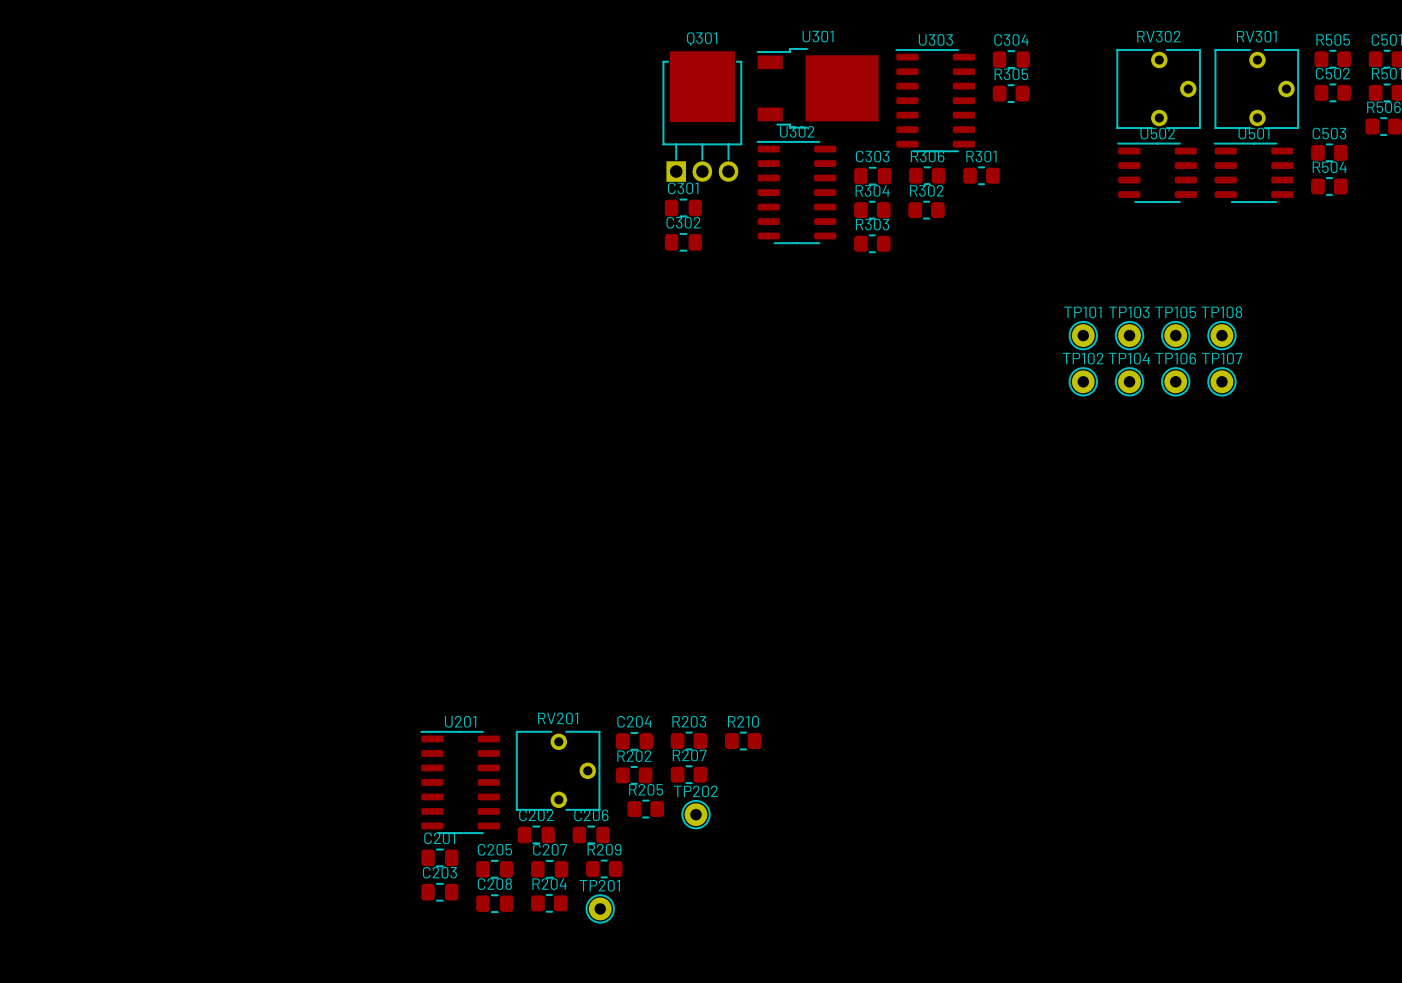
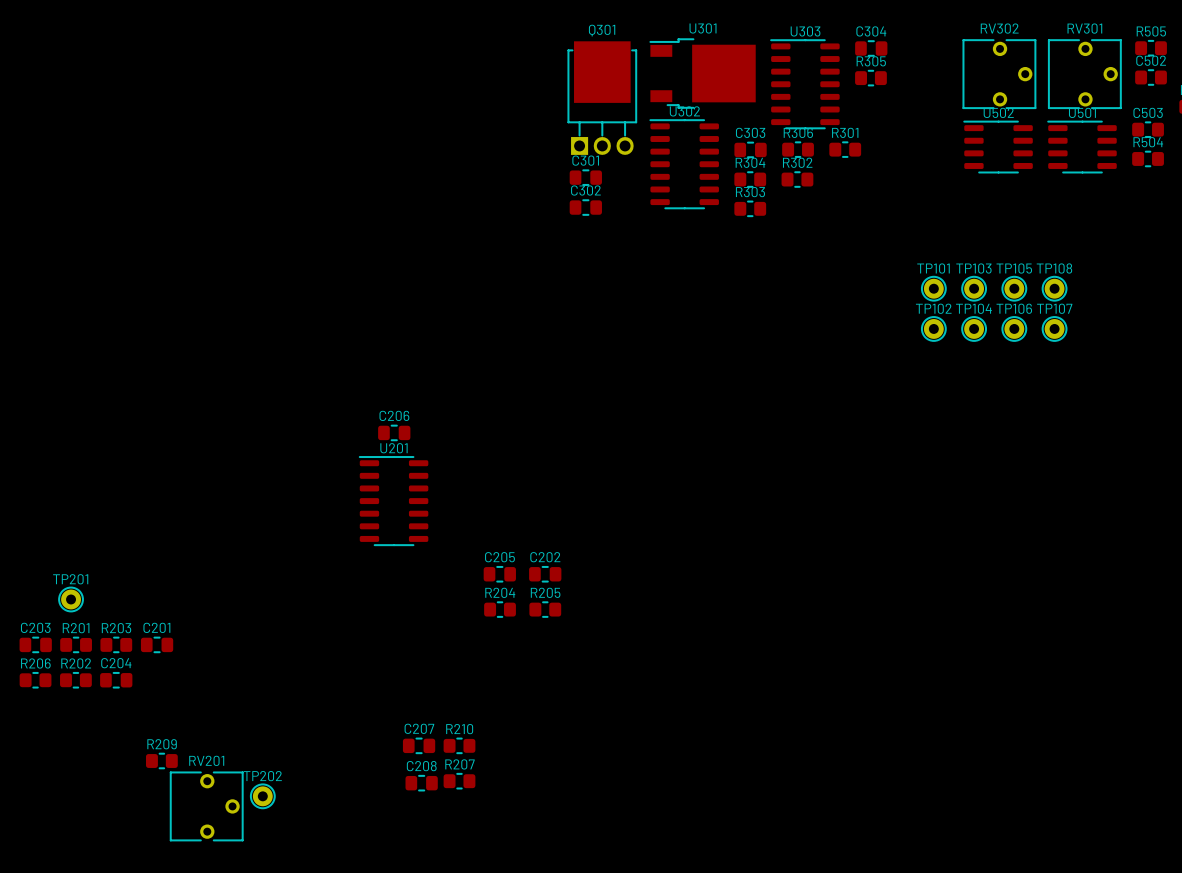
C204 position: (634, 741) -> (116, 680)
R203 position: (689, 741) -> (116, 644)
R210 position: (743, 741) -> (459, 745)
R201: none -> (76, 644)
RV201 position: (558, 770) -> (206, 806)
R207 position: (689, 774) -> (459, 781)
R202 position: (634, 775) -> (75, 680)
U201 position: (460, 782) -> (393, 501)
R206: none -> (35, 680)
R205 position: (645, 809) -> (545, 609)
TP202 position: (696, 814) -> (262, 796)
C202 position: (536, 834) -> (545, 574)
C206 position: (591, 834) -> (394, 432)
C201 position: (439, 857) -> (157, 644)
R209 position: (604, 868) -> (161, 761)
C205 position: (494, 869) -> (499, 574)
C207 position: (549, 869) -> (419, 745)
C203 position: (439, 892) -> (35, 644)
R204 position: (549, 903) -> (500, 609)
TP201 position: (600, 908) -> (71, 599)

